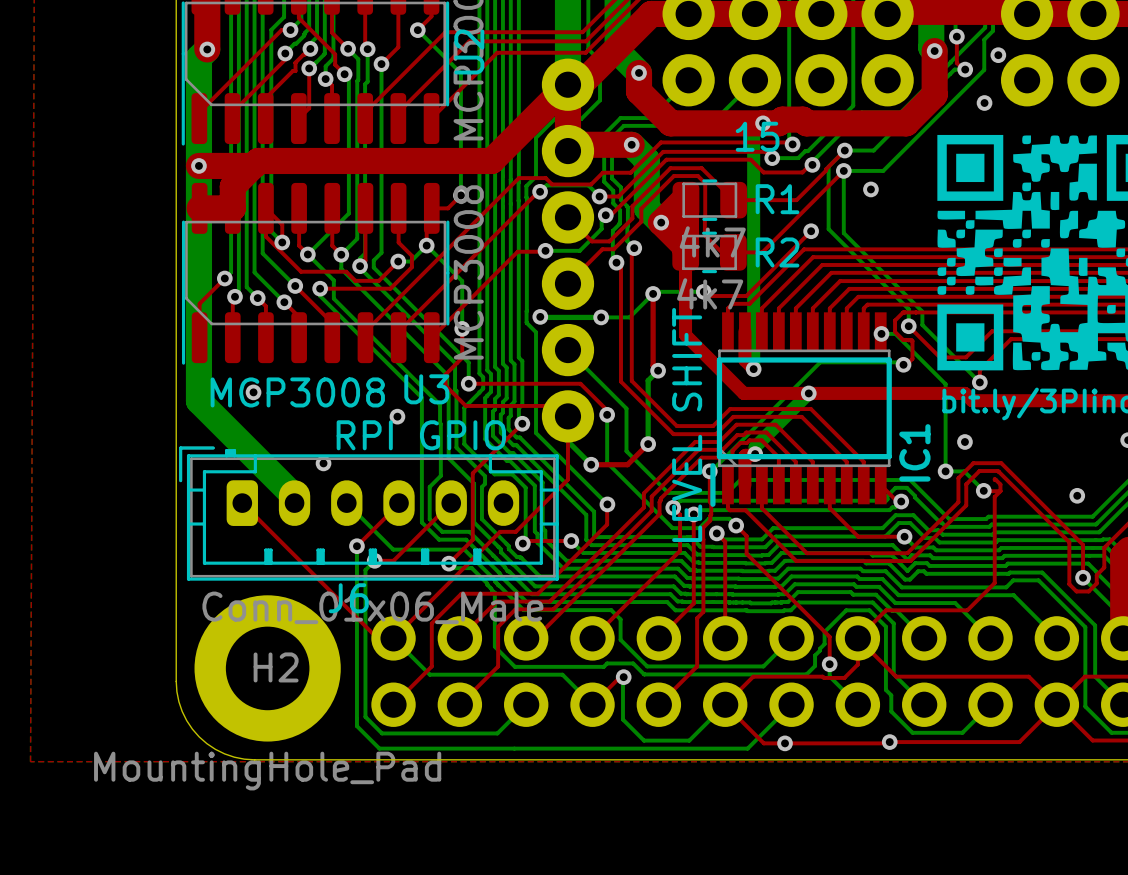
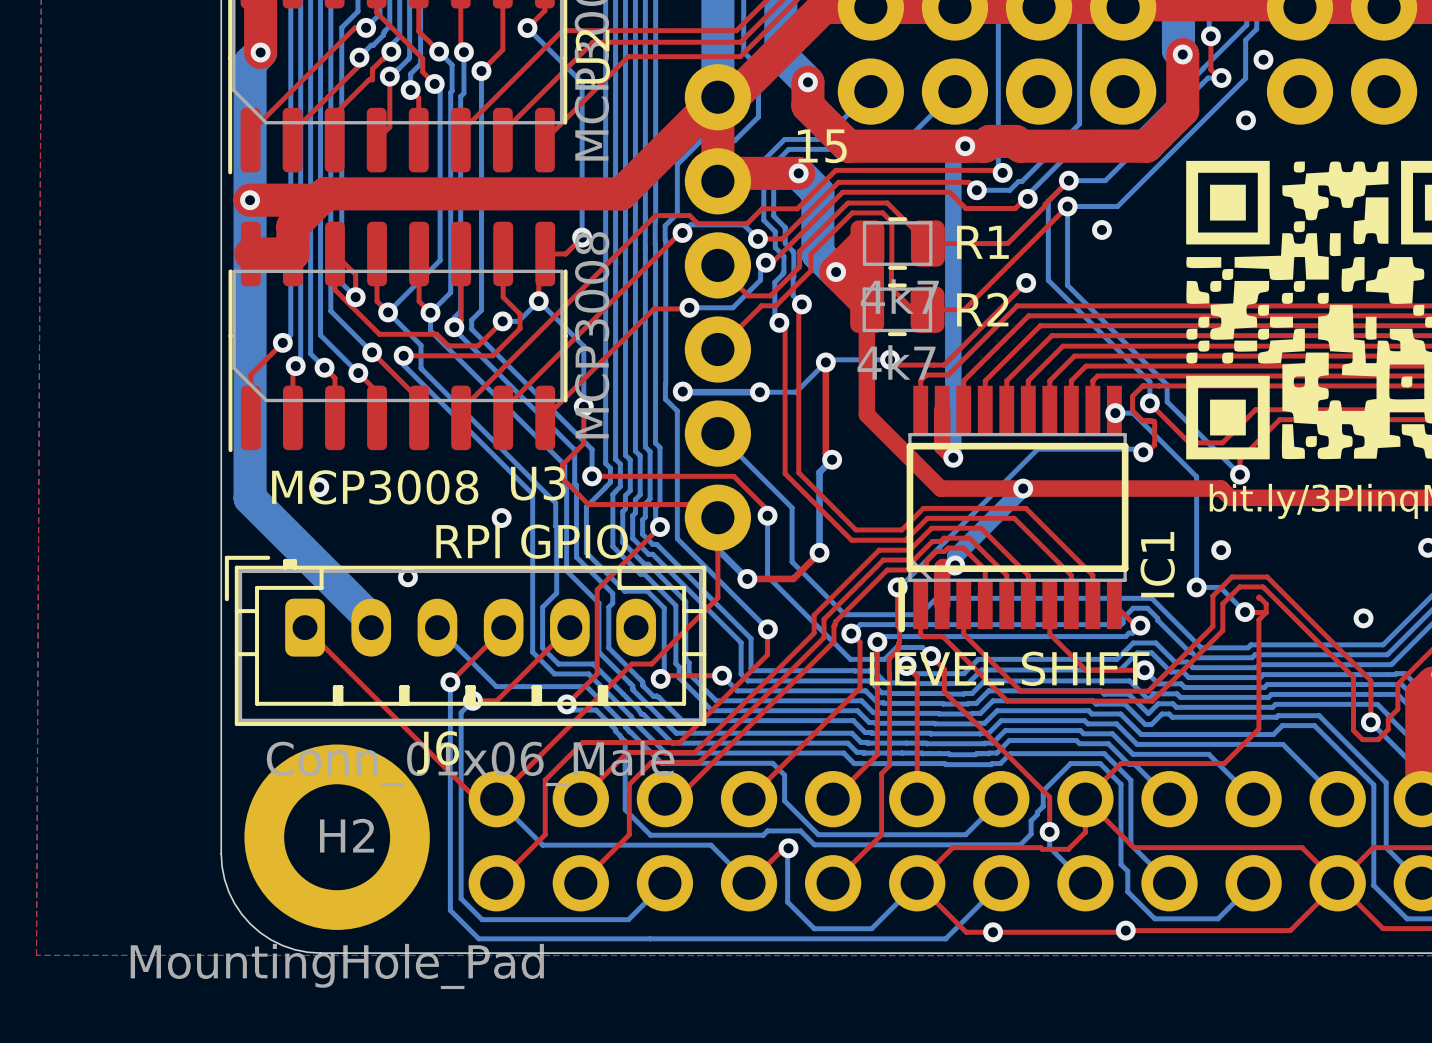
text position: 15 (757, 136) -> 15 (822, 146)
text rotation: 0° (687, 424) -> 90° clockwise (1009, 668)

